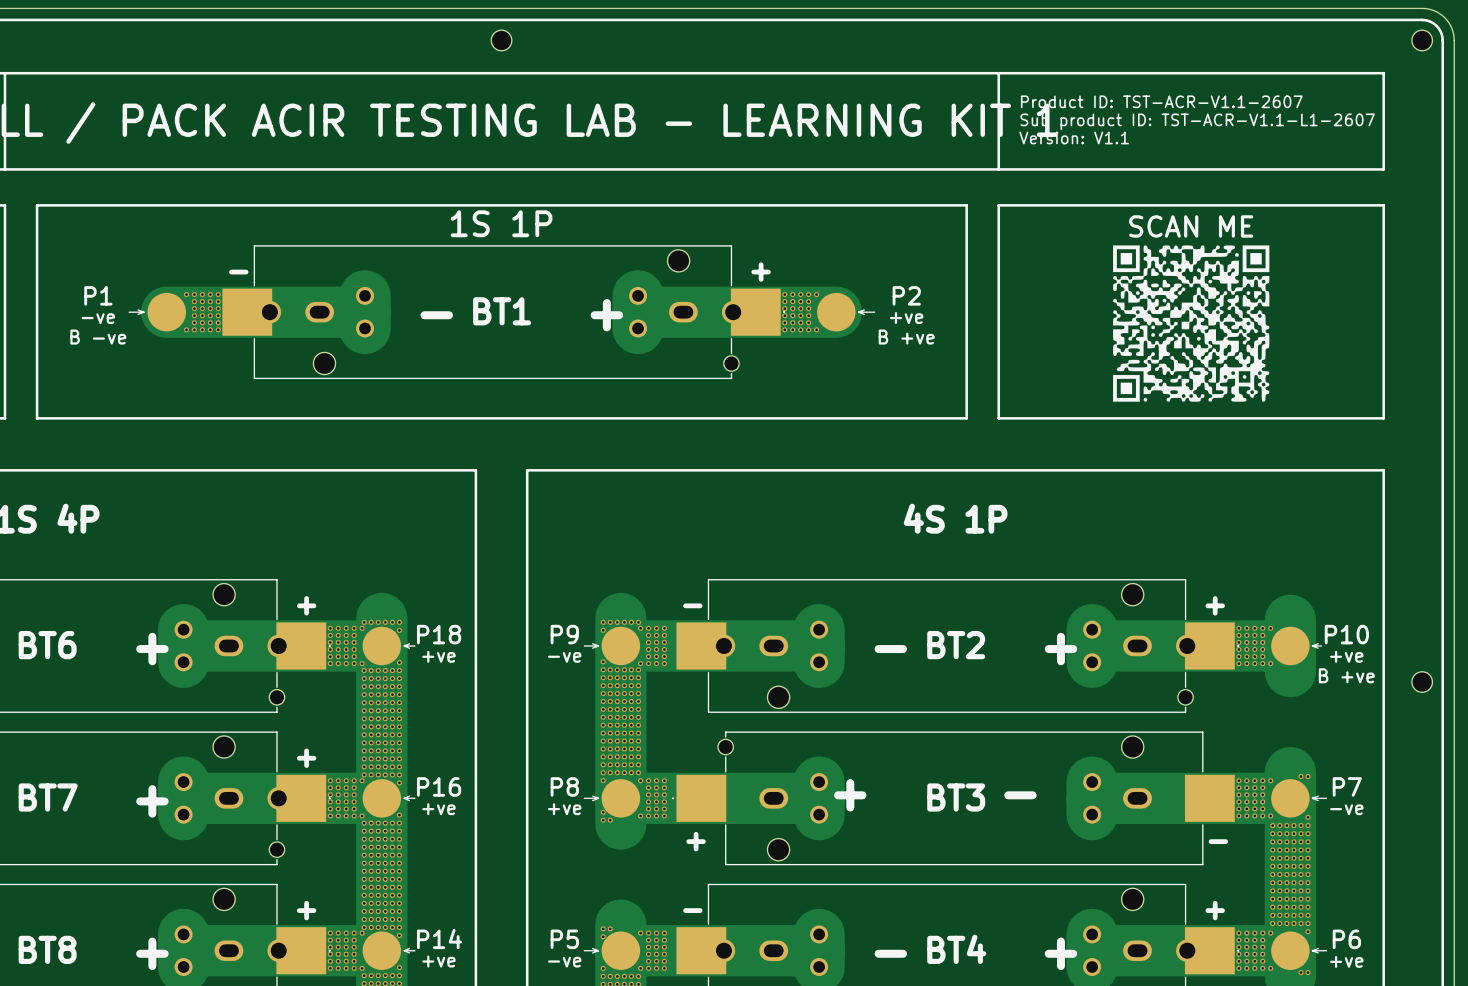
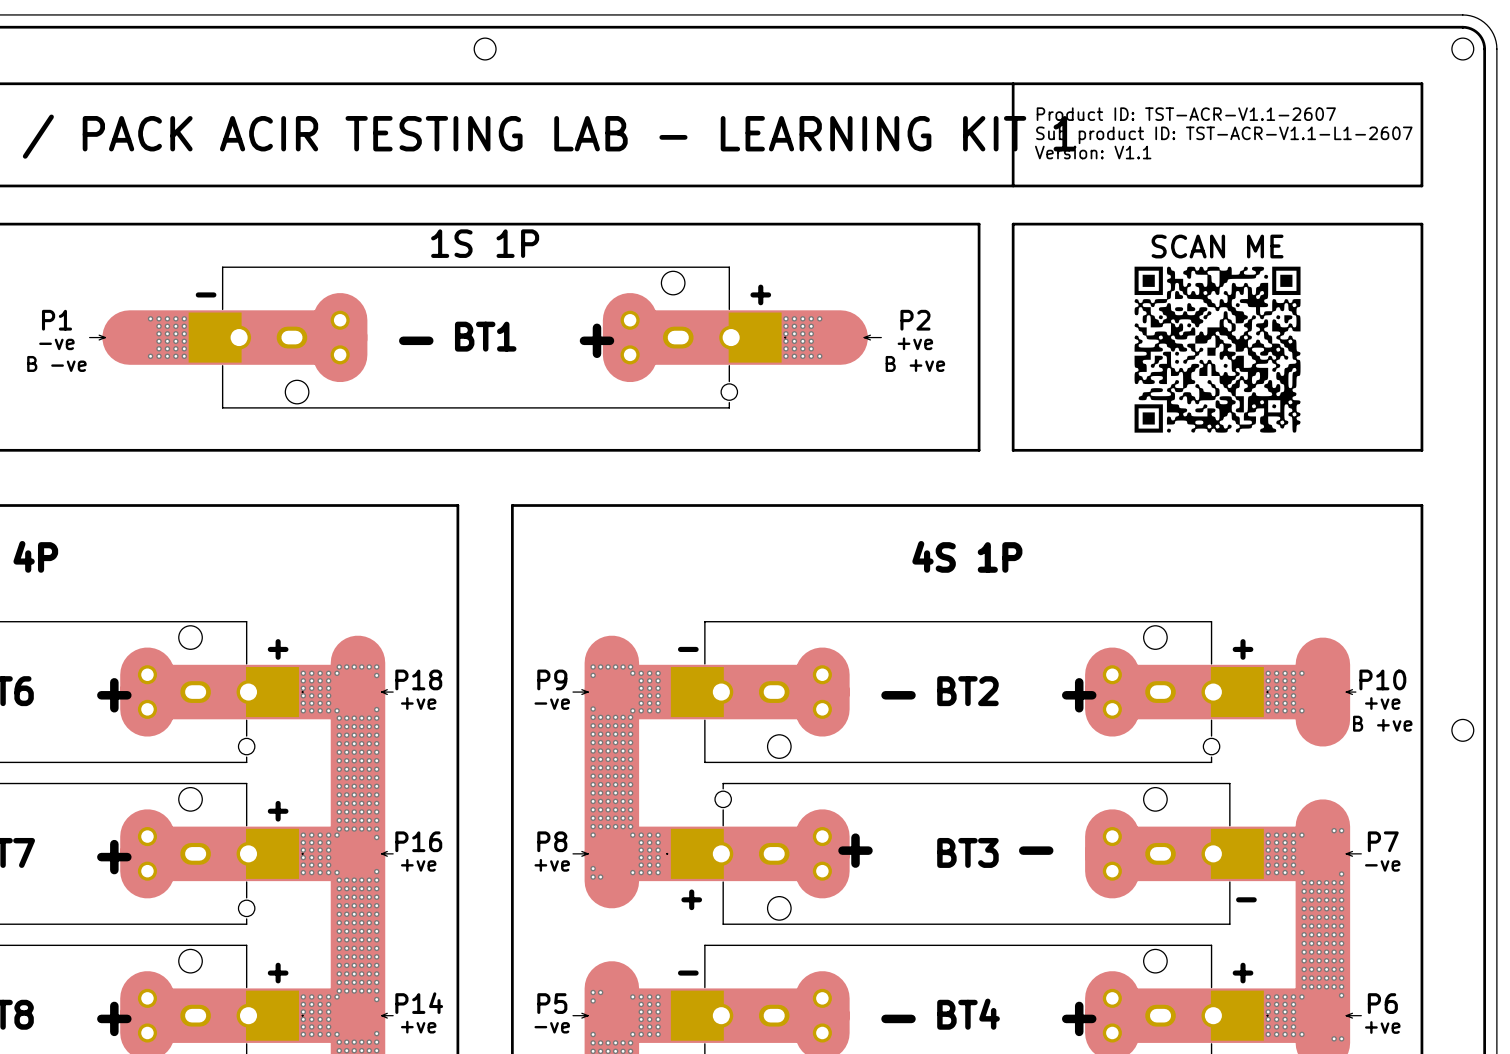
BT3 footprint: [672, 731, 1235, 866] -> [666, 782, 1264, 925]

